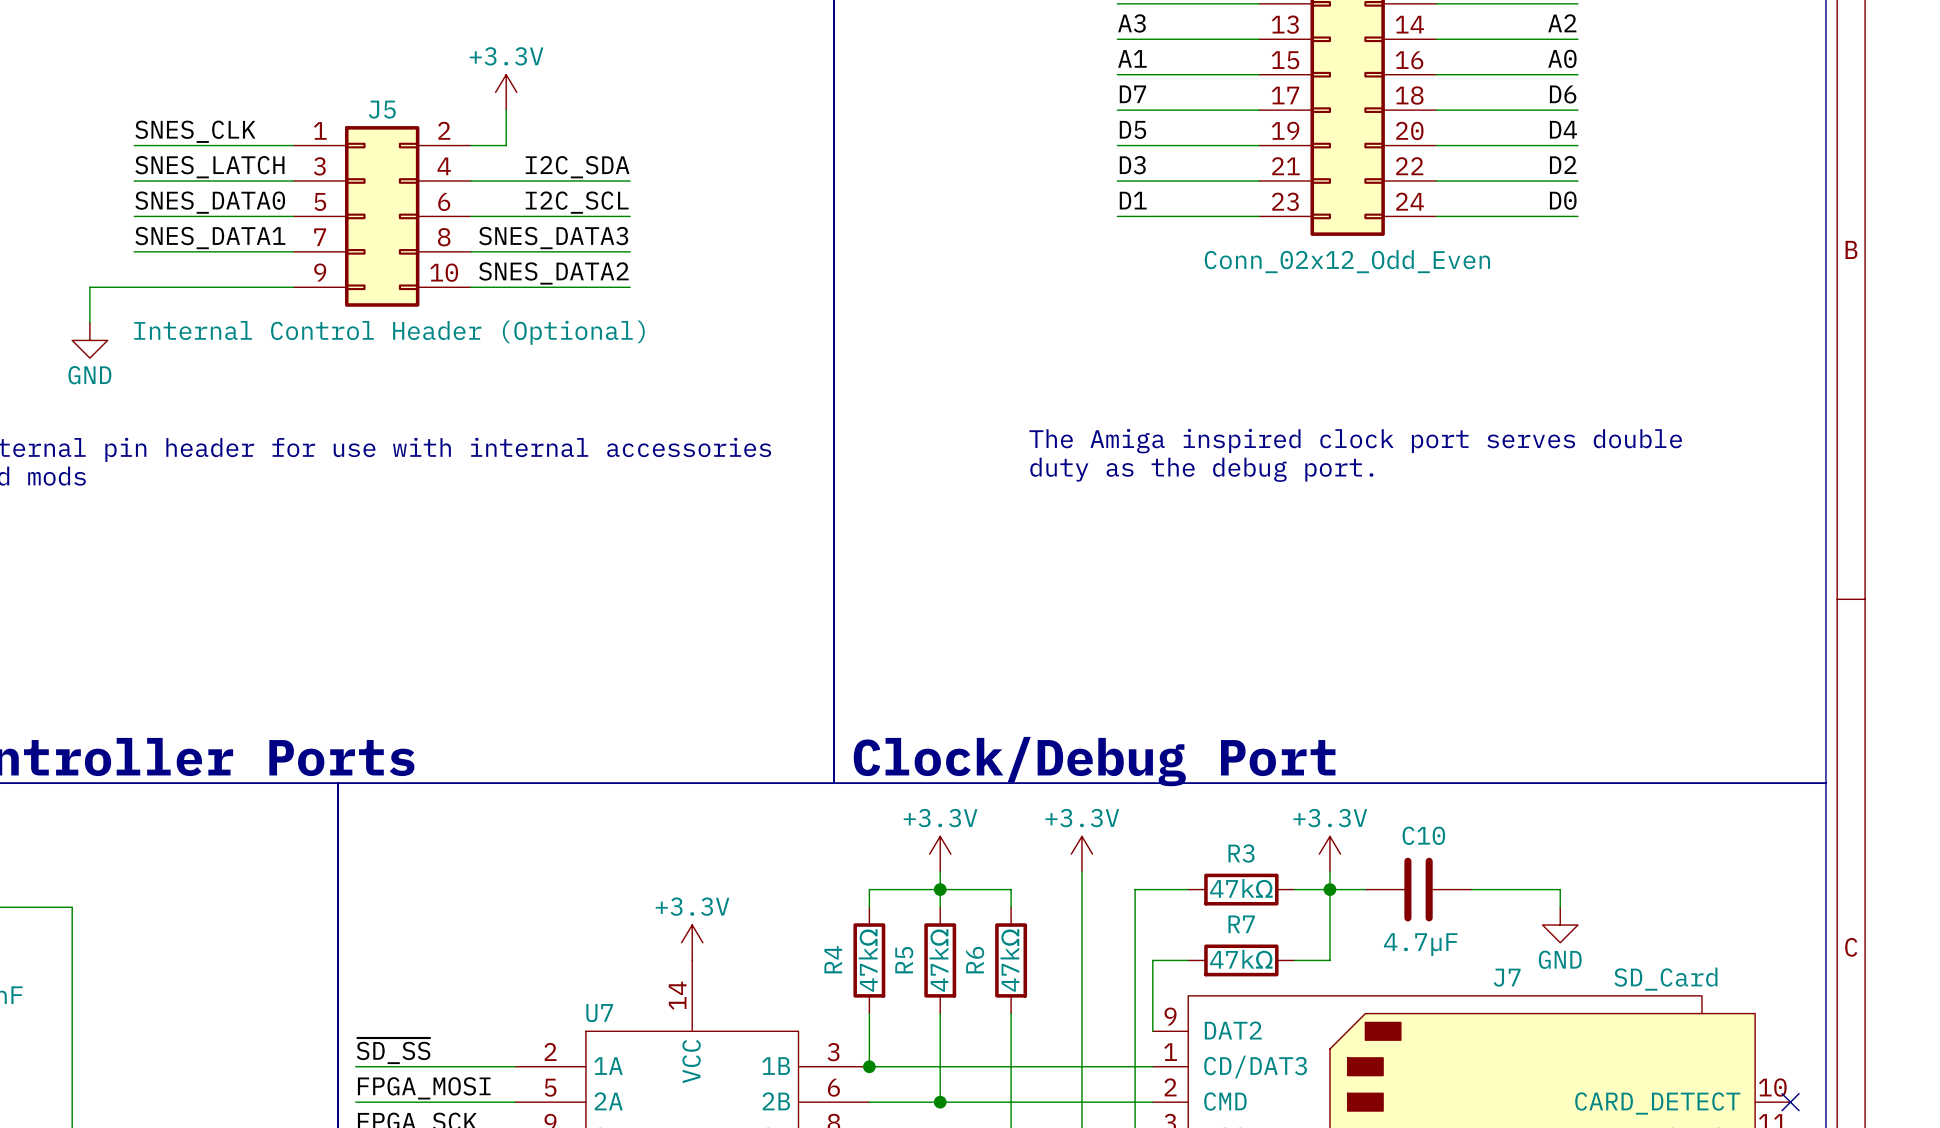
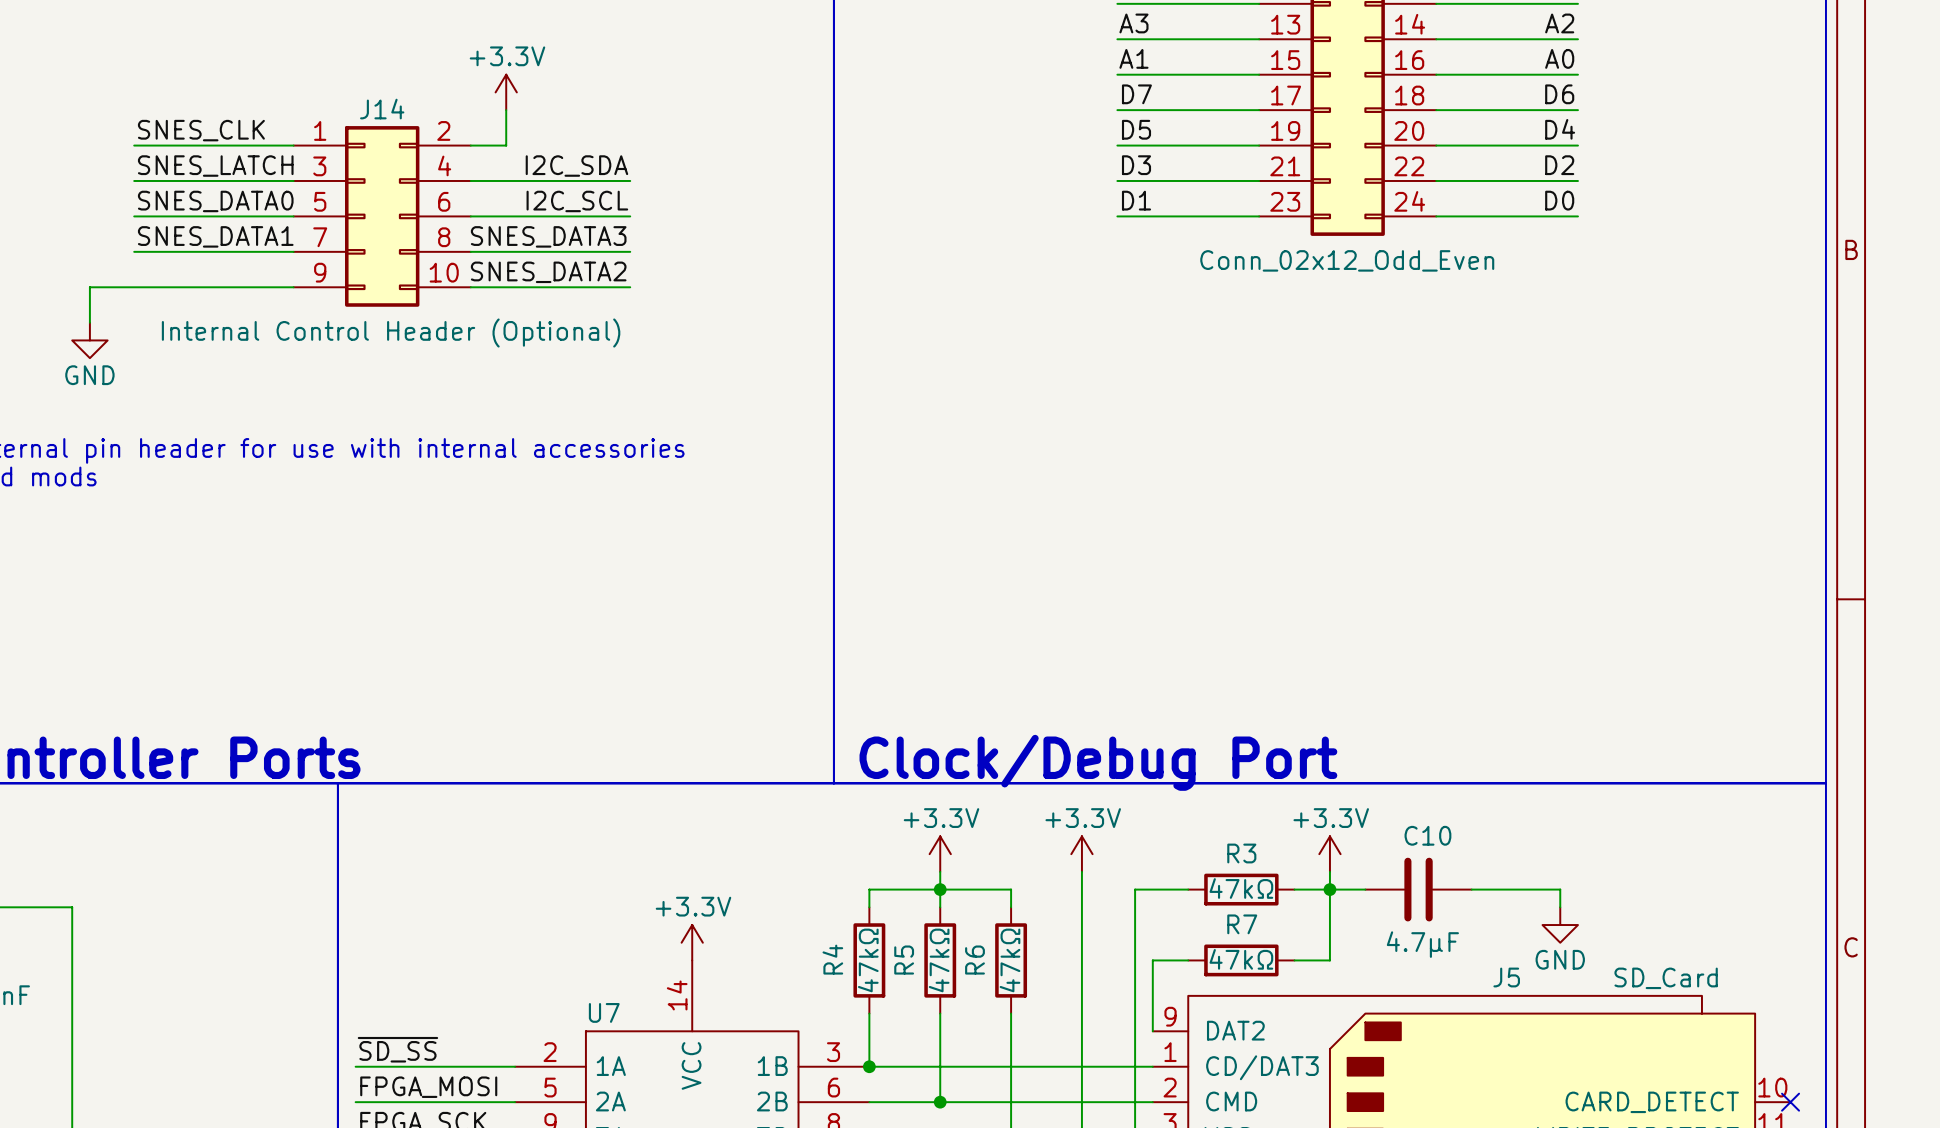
J5 name: J5 (382, 109) -> J14 (382, 109)
text: The Amiga inspired clock port serves double (1355, 441) -> none
text: duty as the debug port. (1201, 469) -> none
J7 name: J7 (1507, 977) -> J5 (1506, 977)

